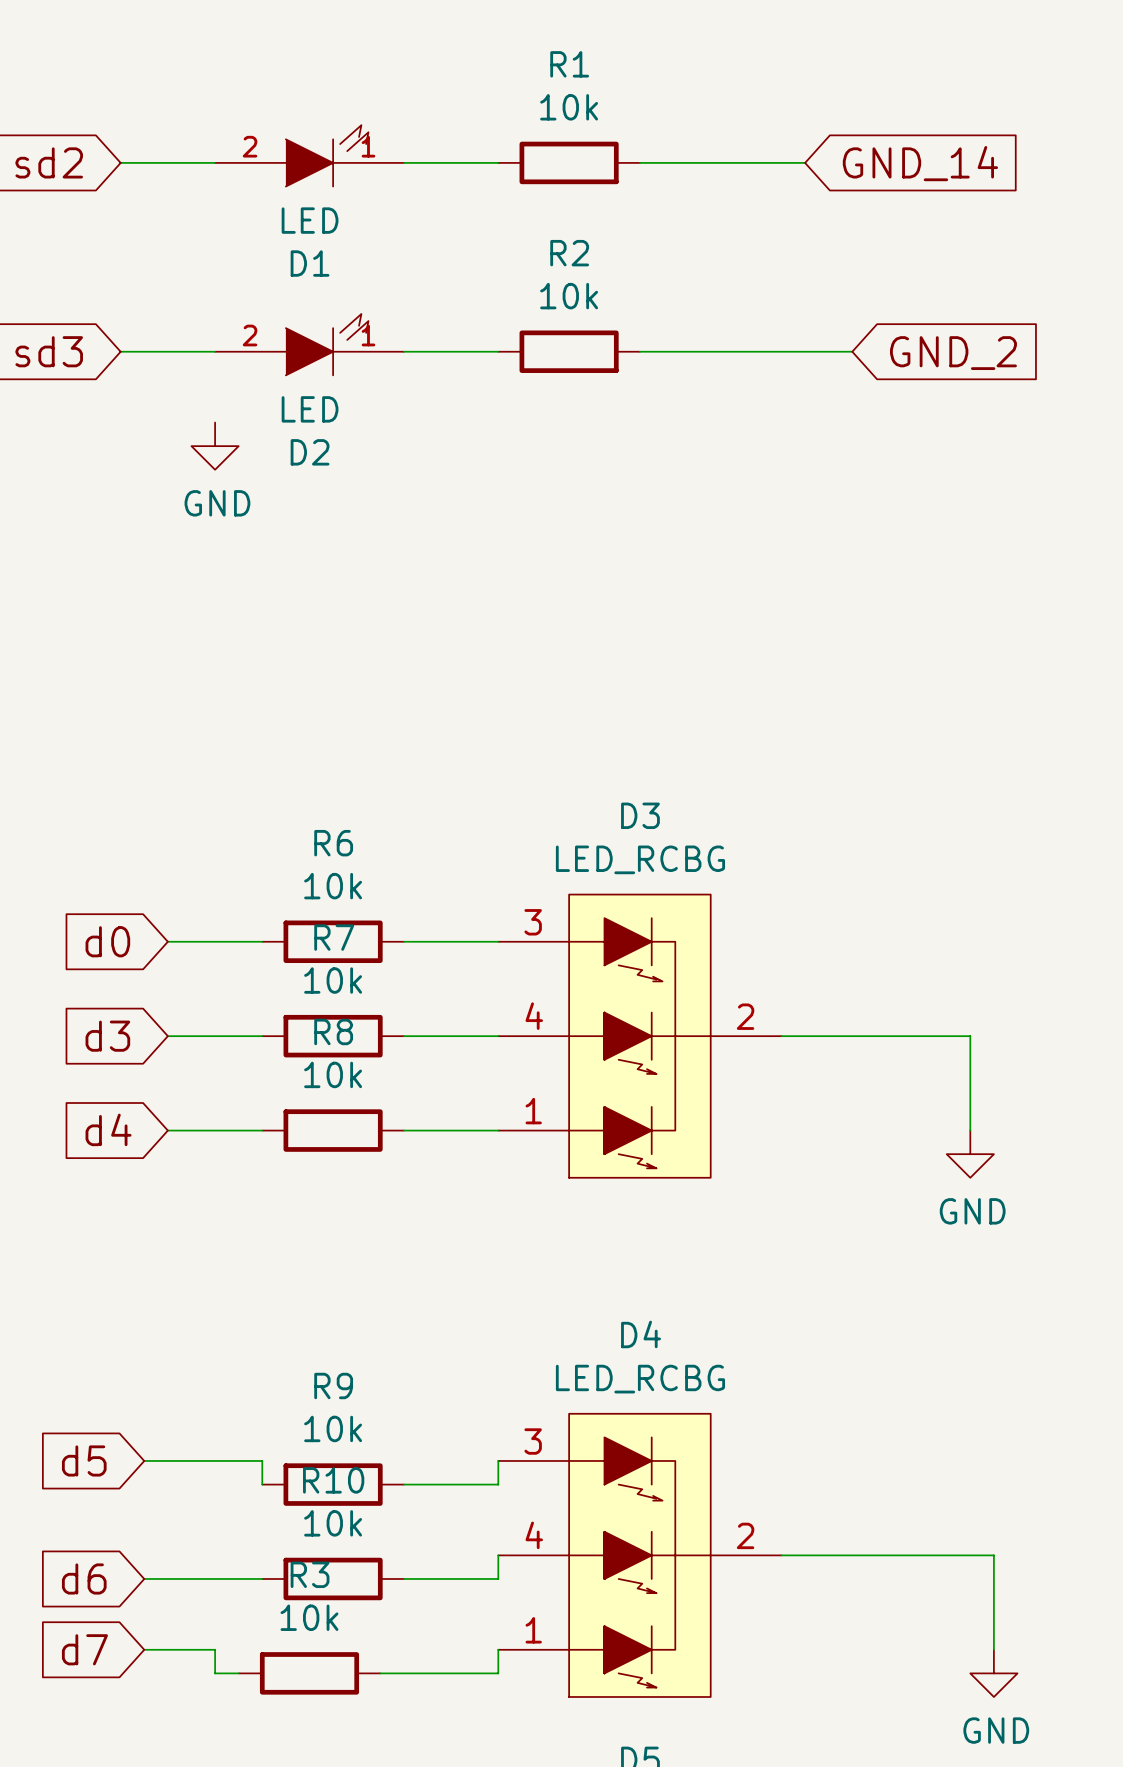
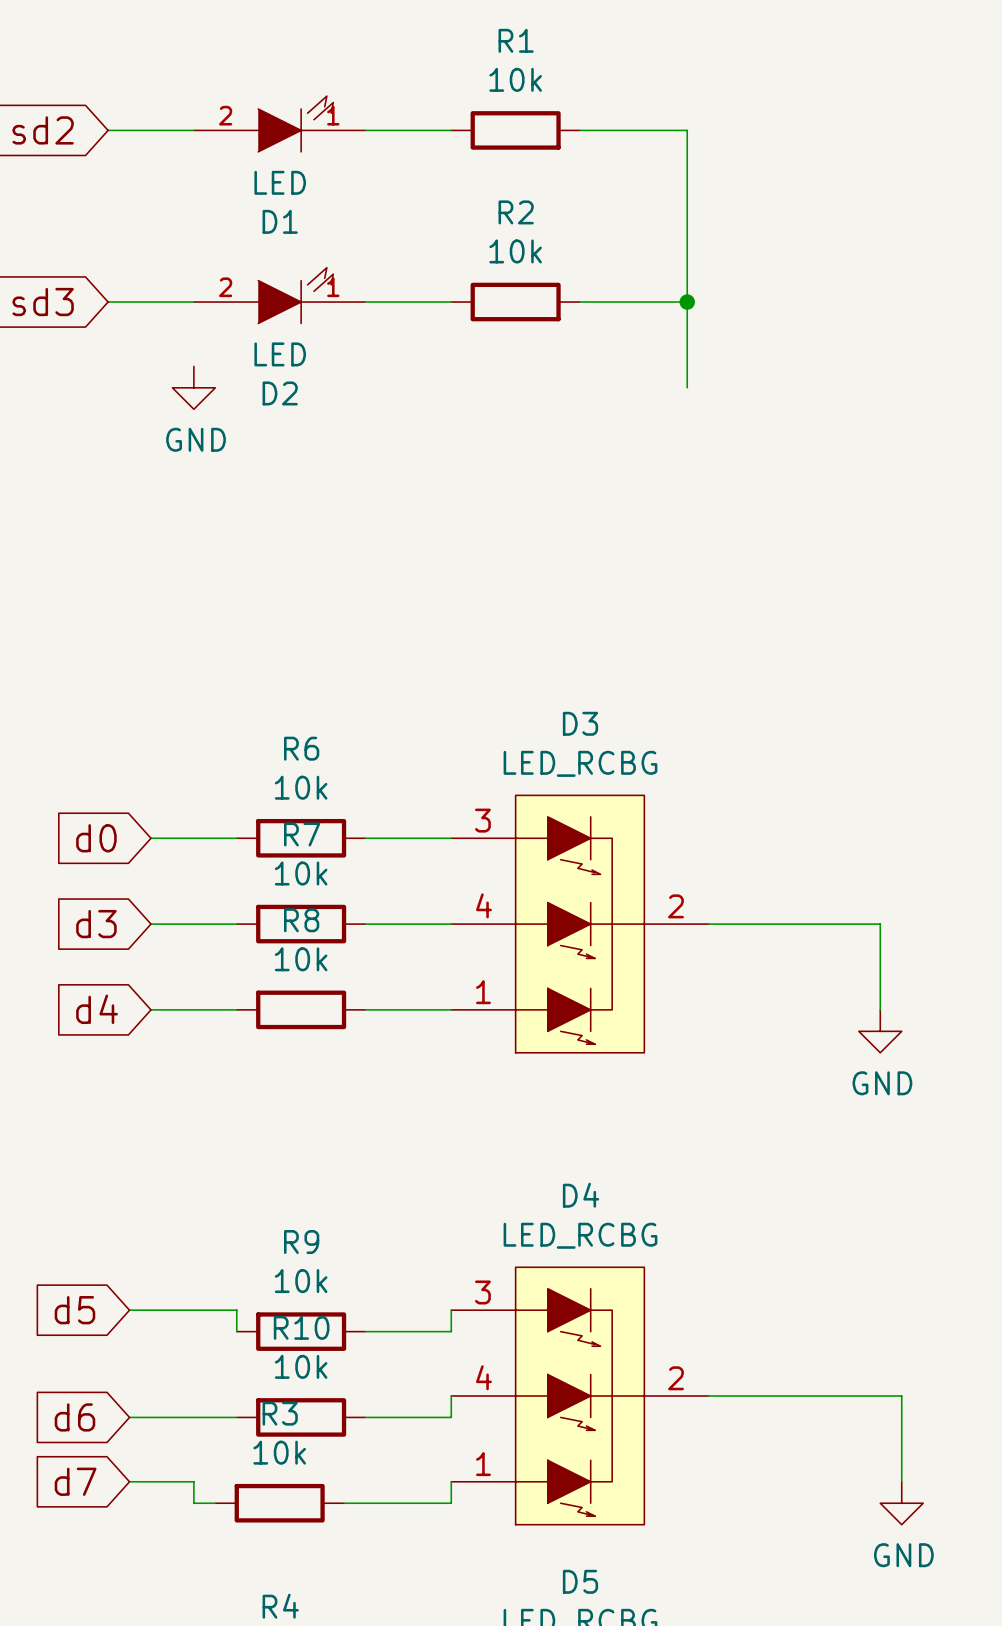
wire: (757, 162) (805, 162) -> (687, 130) (687, 387)
global label: GND_14 (920, 163) -> none
wire: (757, 351) (852, 351) -> none
junction: none -> (687, 302)
global label: GND_2 (953, 353) -> none

